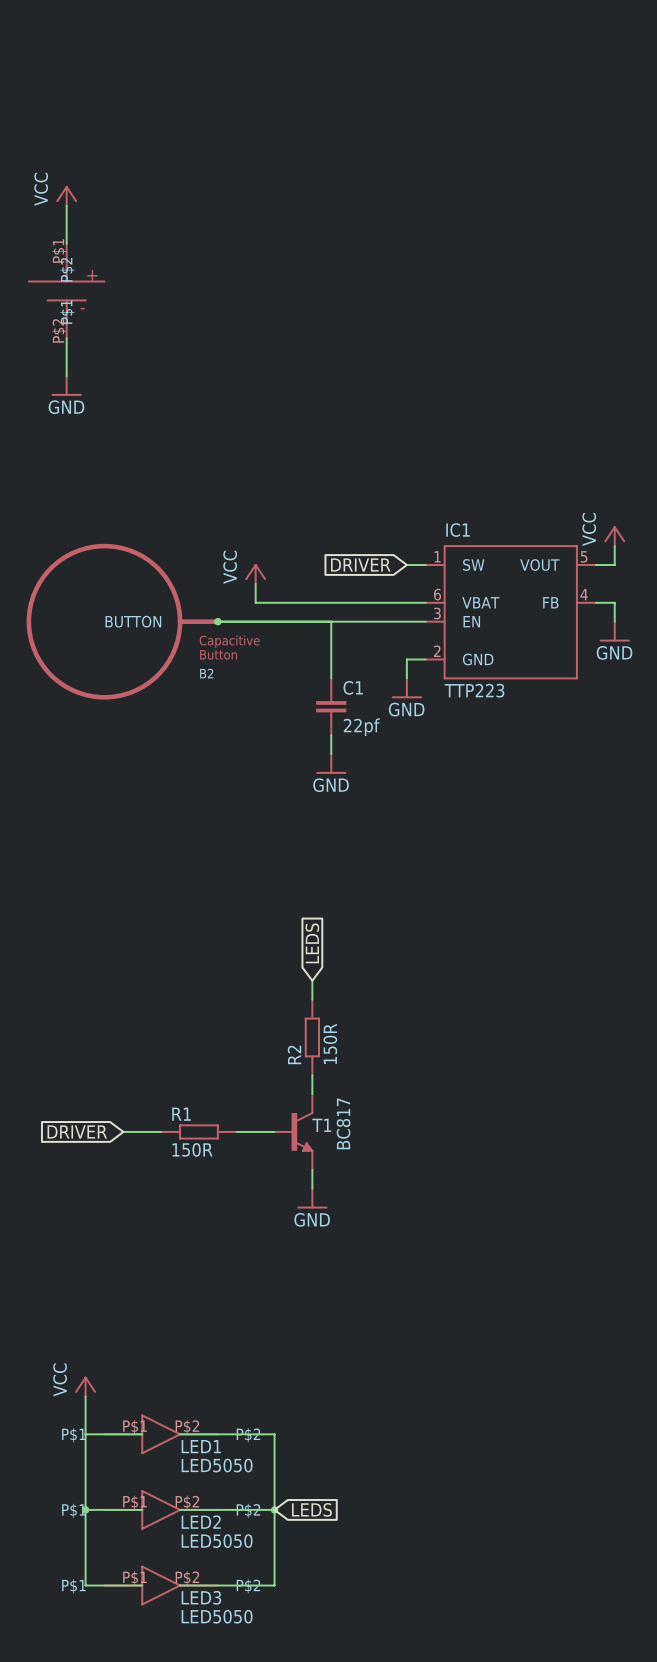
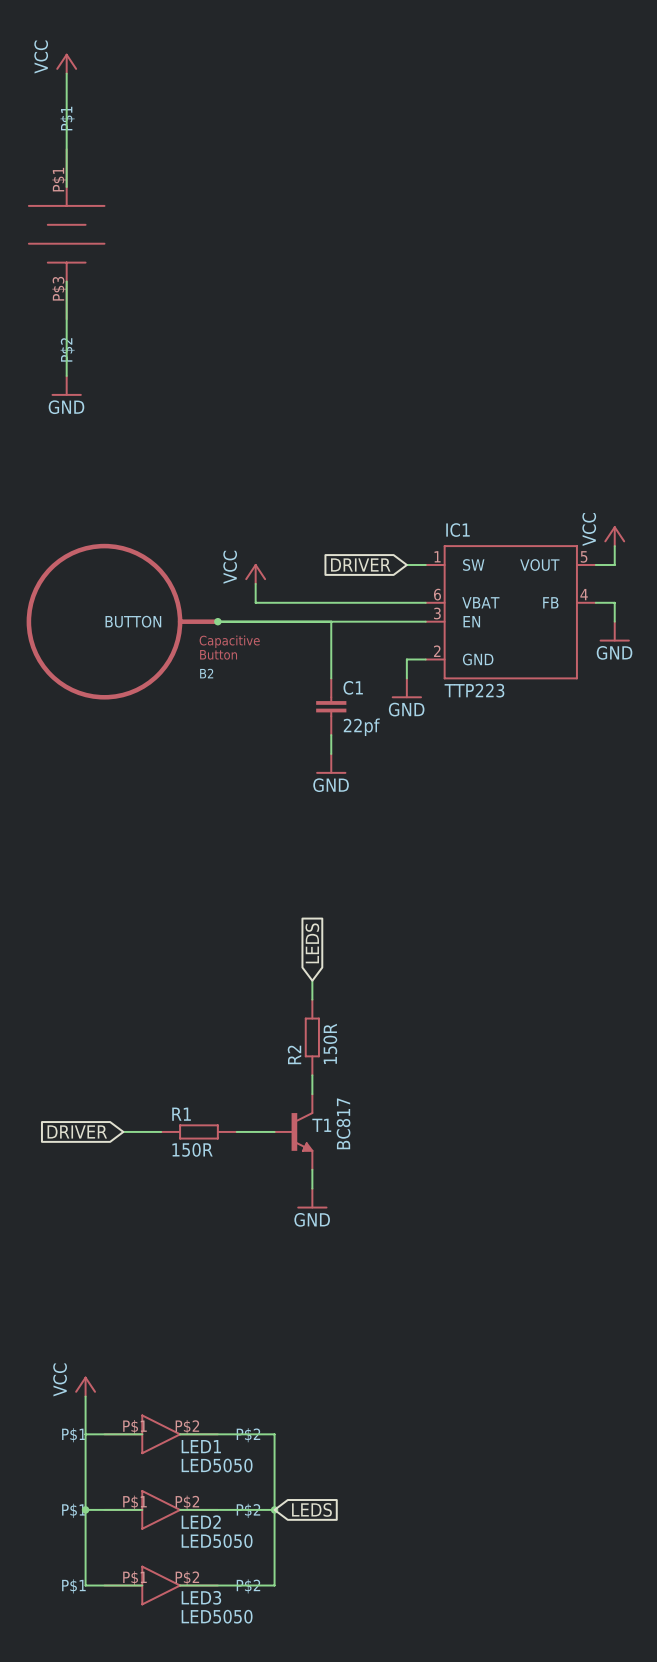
wire: none -> (66, 73) (66, 187)
power symbol position: VCC (66, 196) -> VCC (66, 63)
wire: (66, 205) (66, 243) -> none
part: none -> (66, 234)
part: (66, 290) -> none

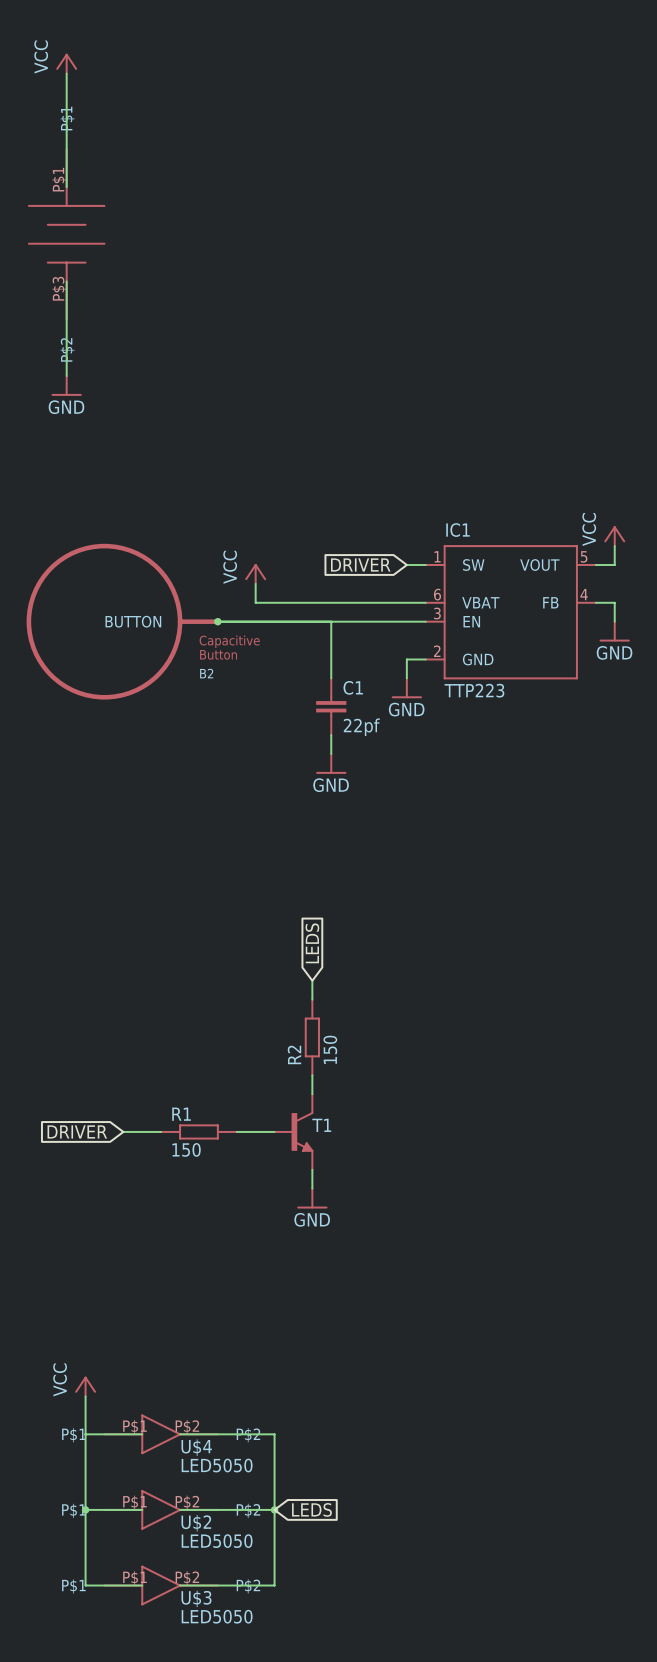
R2 value: 150R (330, 1043) -> 150 (330, 1049)
T1 value: BC817 (343, 1123) -> none
R1 value: 150R (192, 1149) -> 150 (186, 1149)
LED1 name: LED1 (201, 1446) -> U$4 (196, 1447)
LED2 name: LED2 (201, 1522) -> U$2 (196, 1523)
LED3 name: LED3 (201, 1597) -> U$3 (196, 1598)

